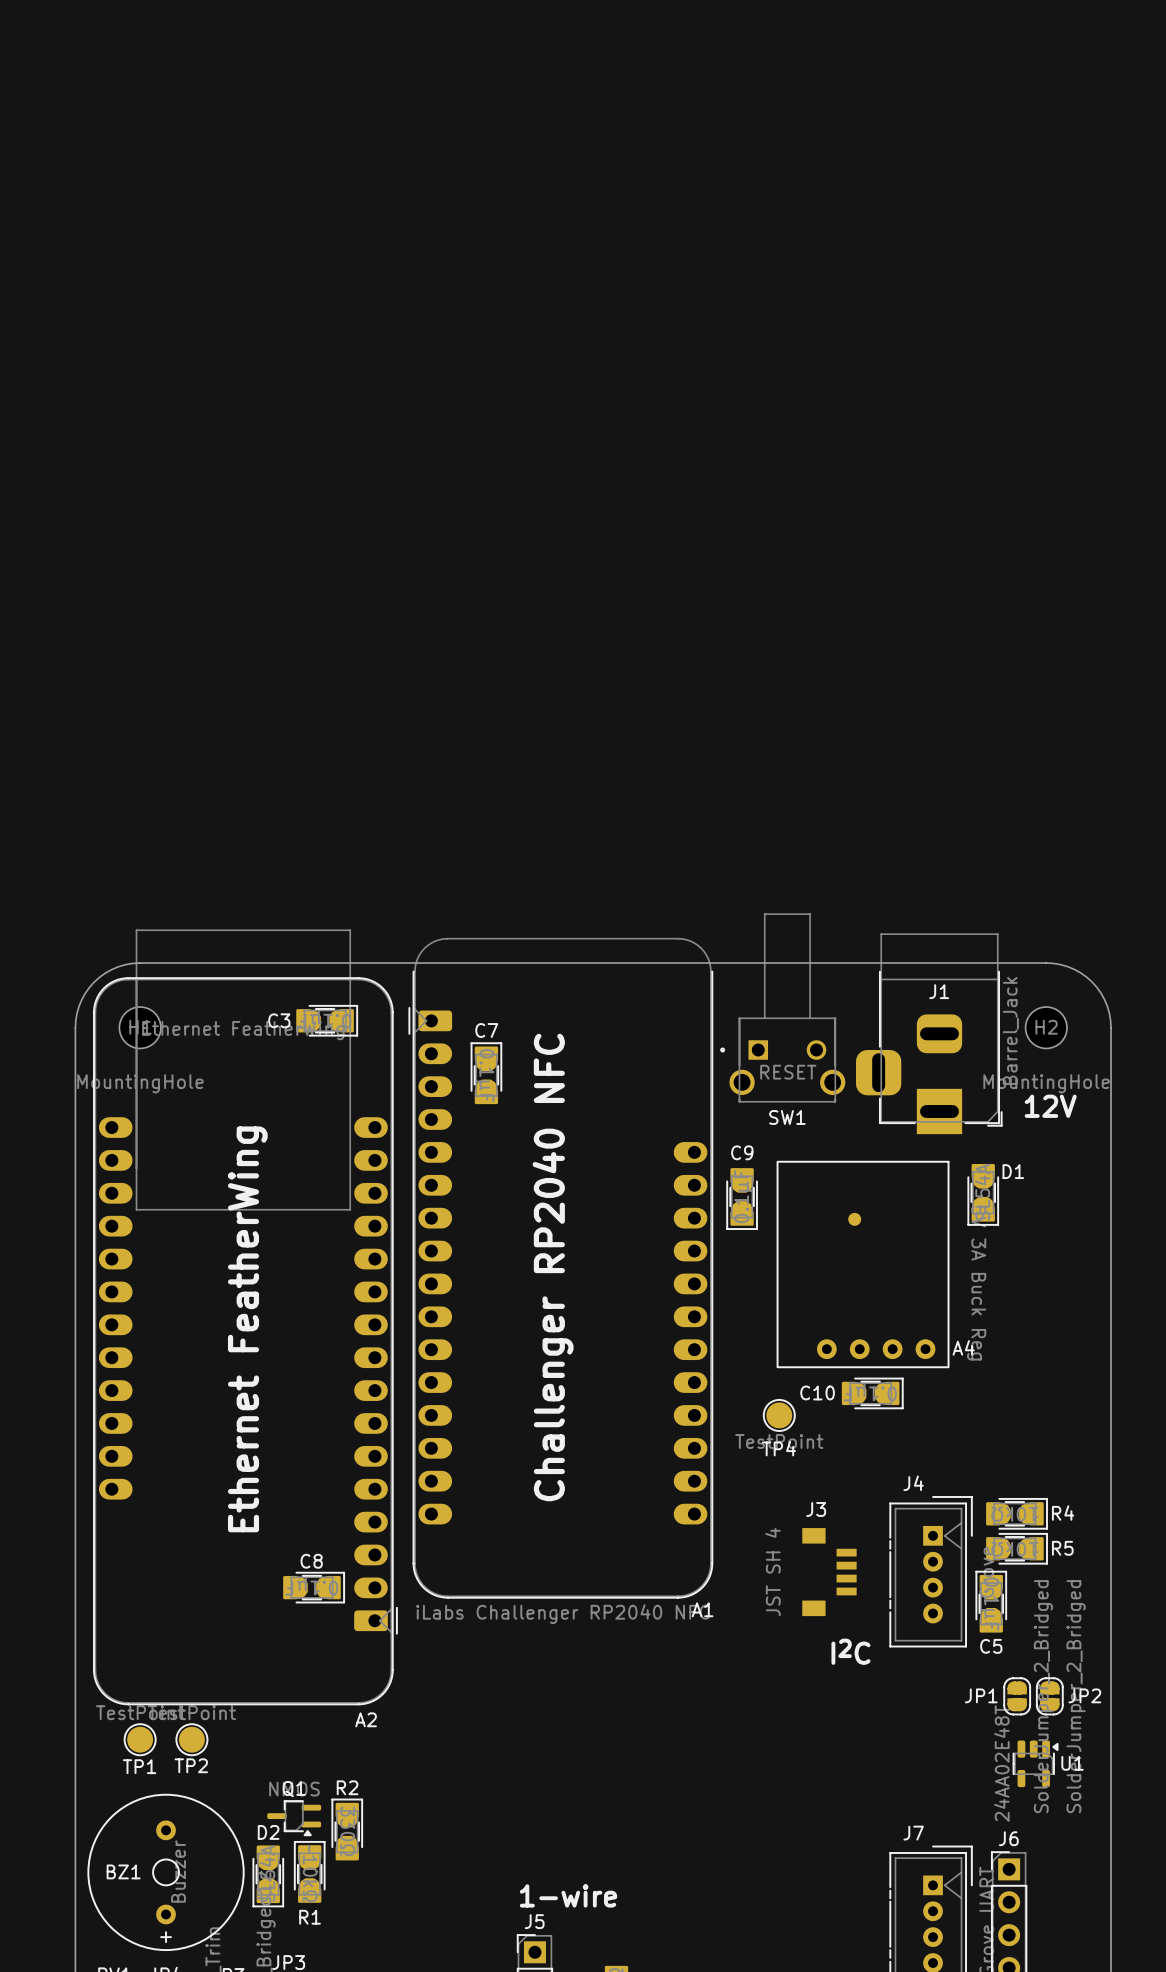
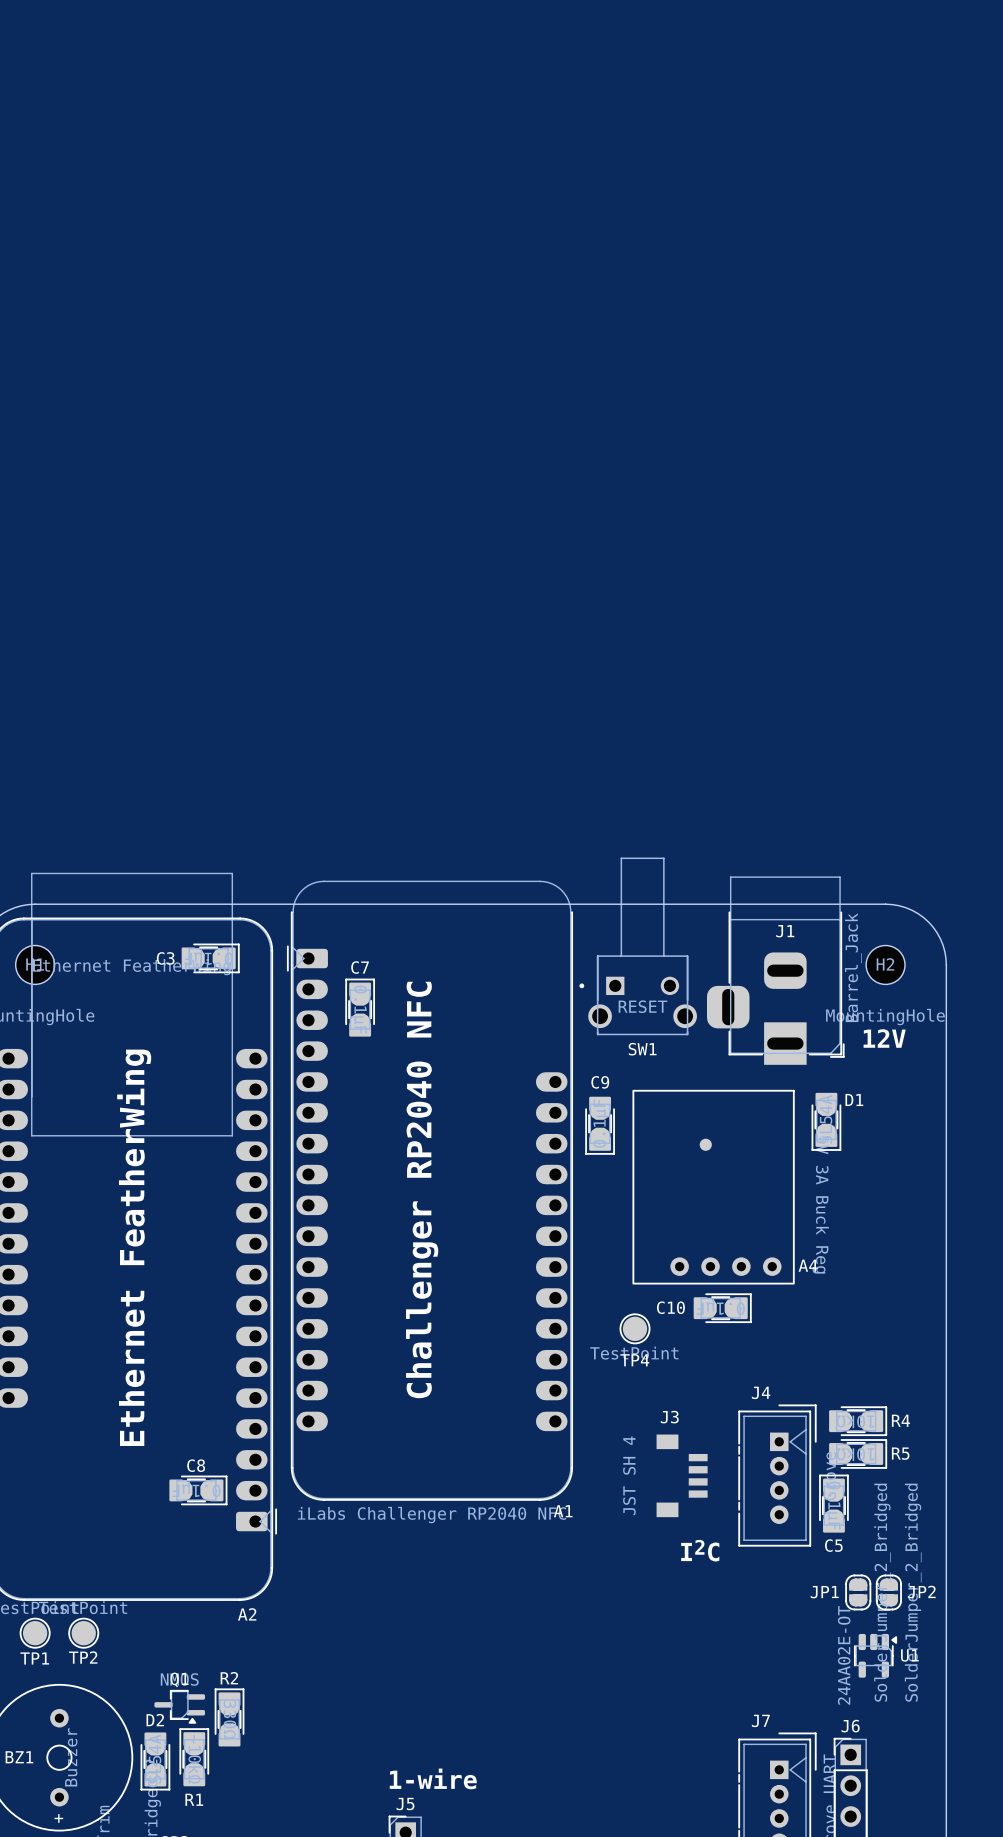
U1 value: 24AA02E48T (1001, 1763) -> 24AA02E-OT (844, 1655)

